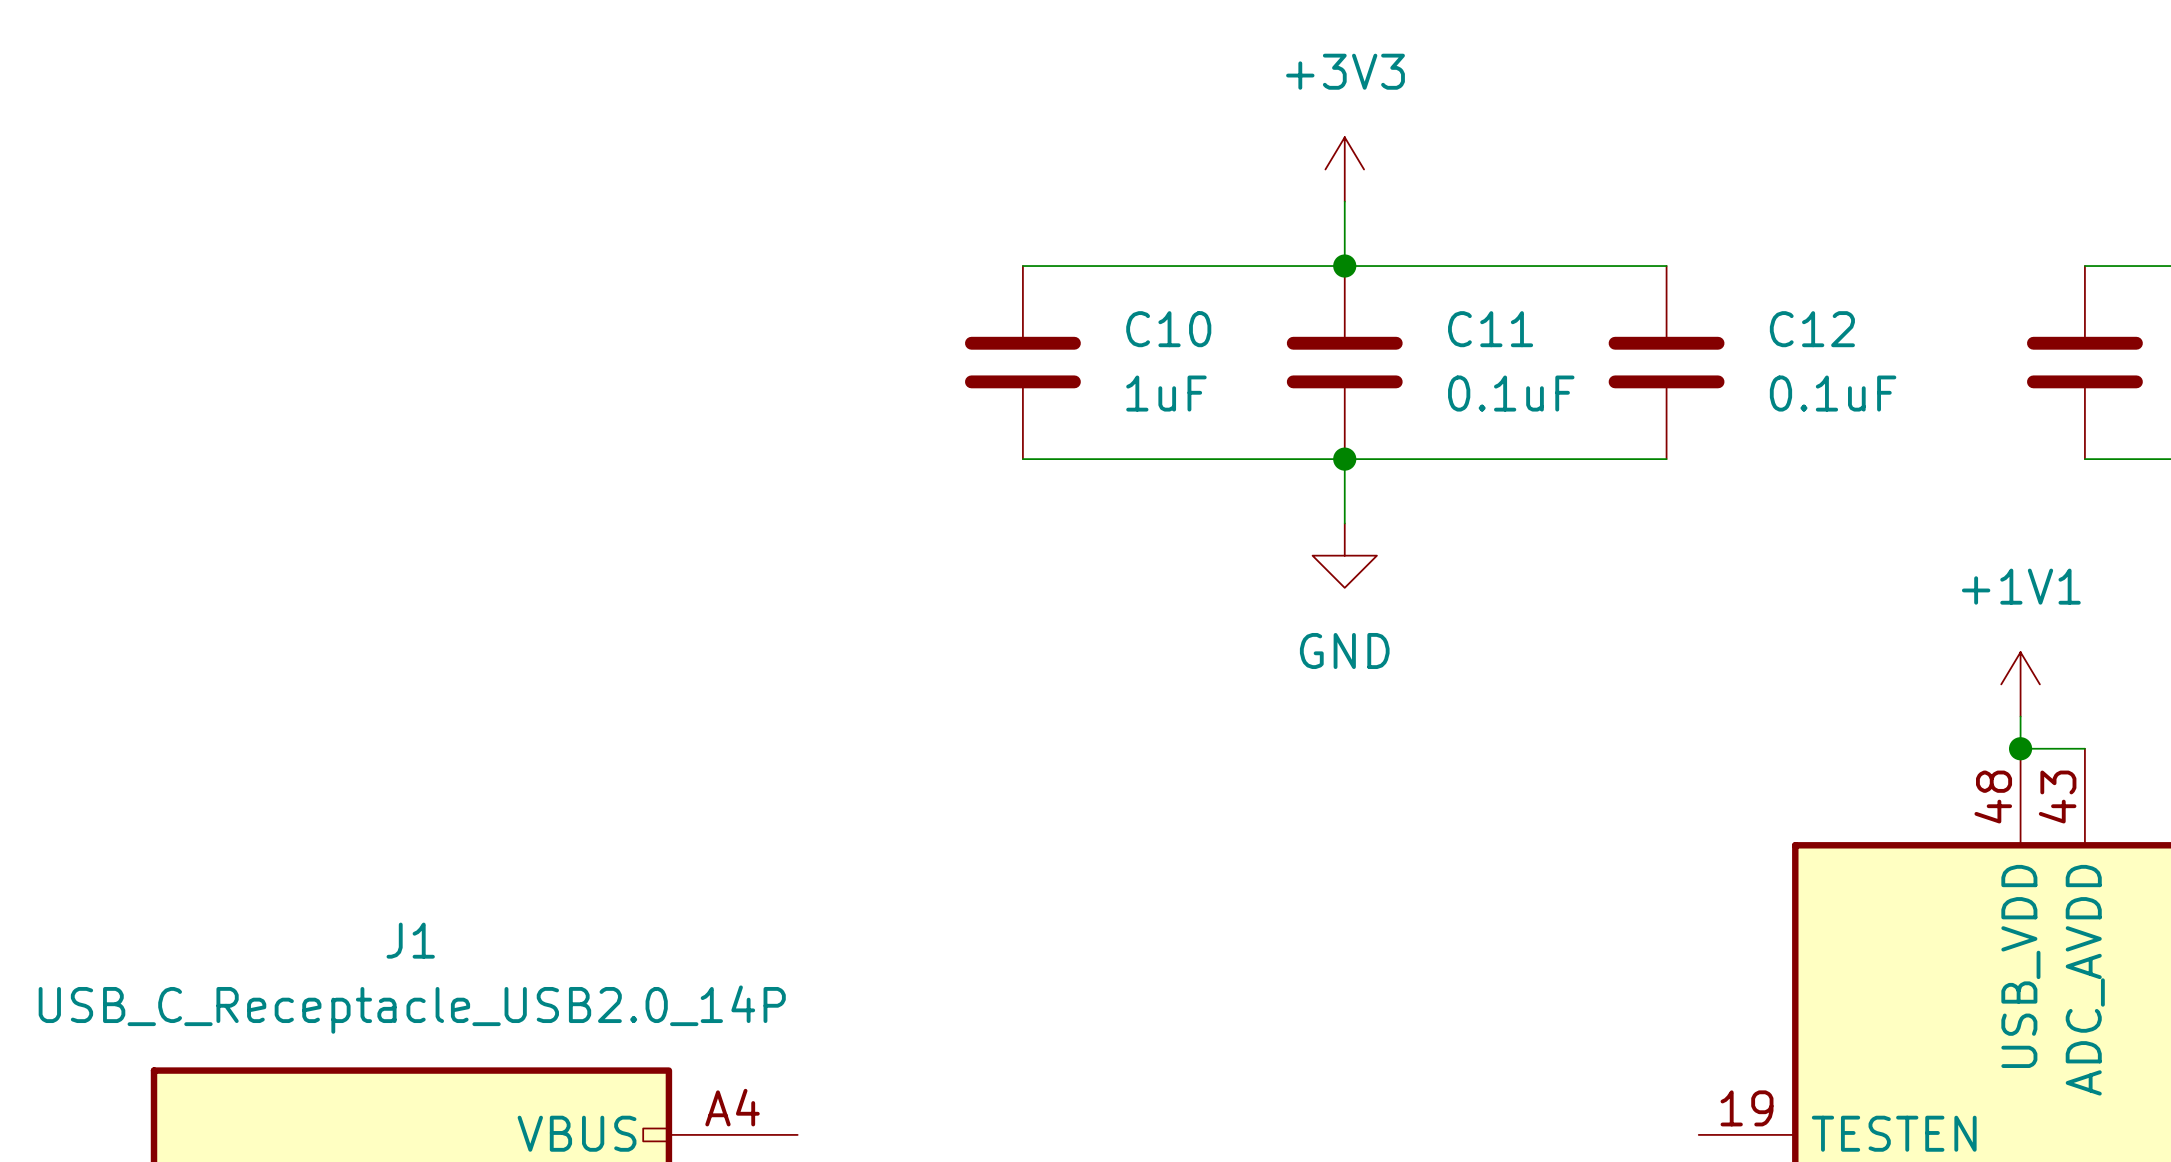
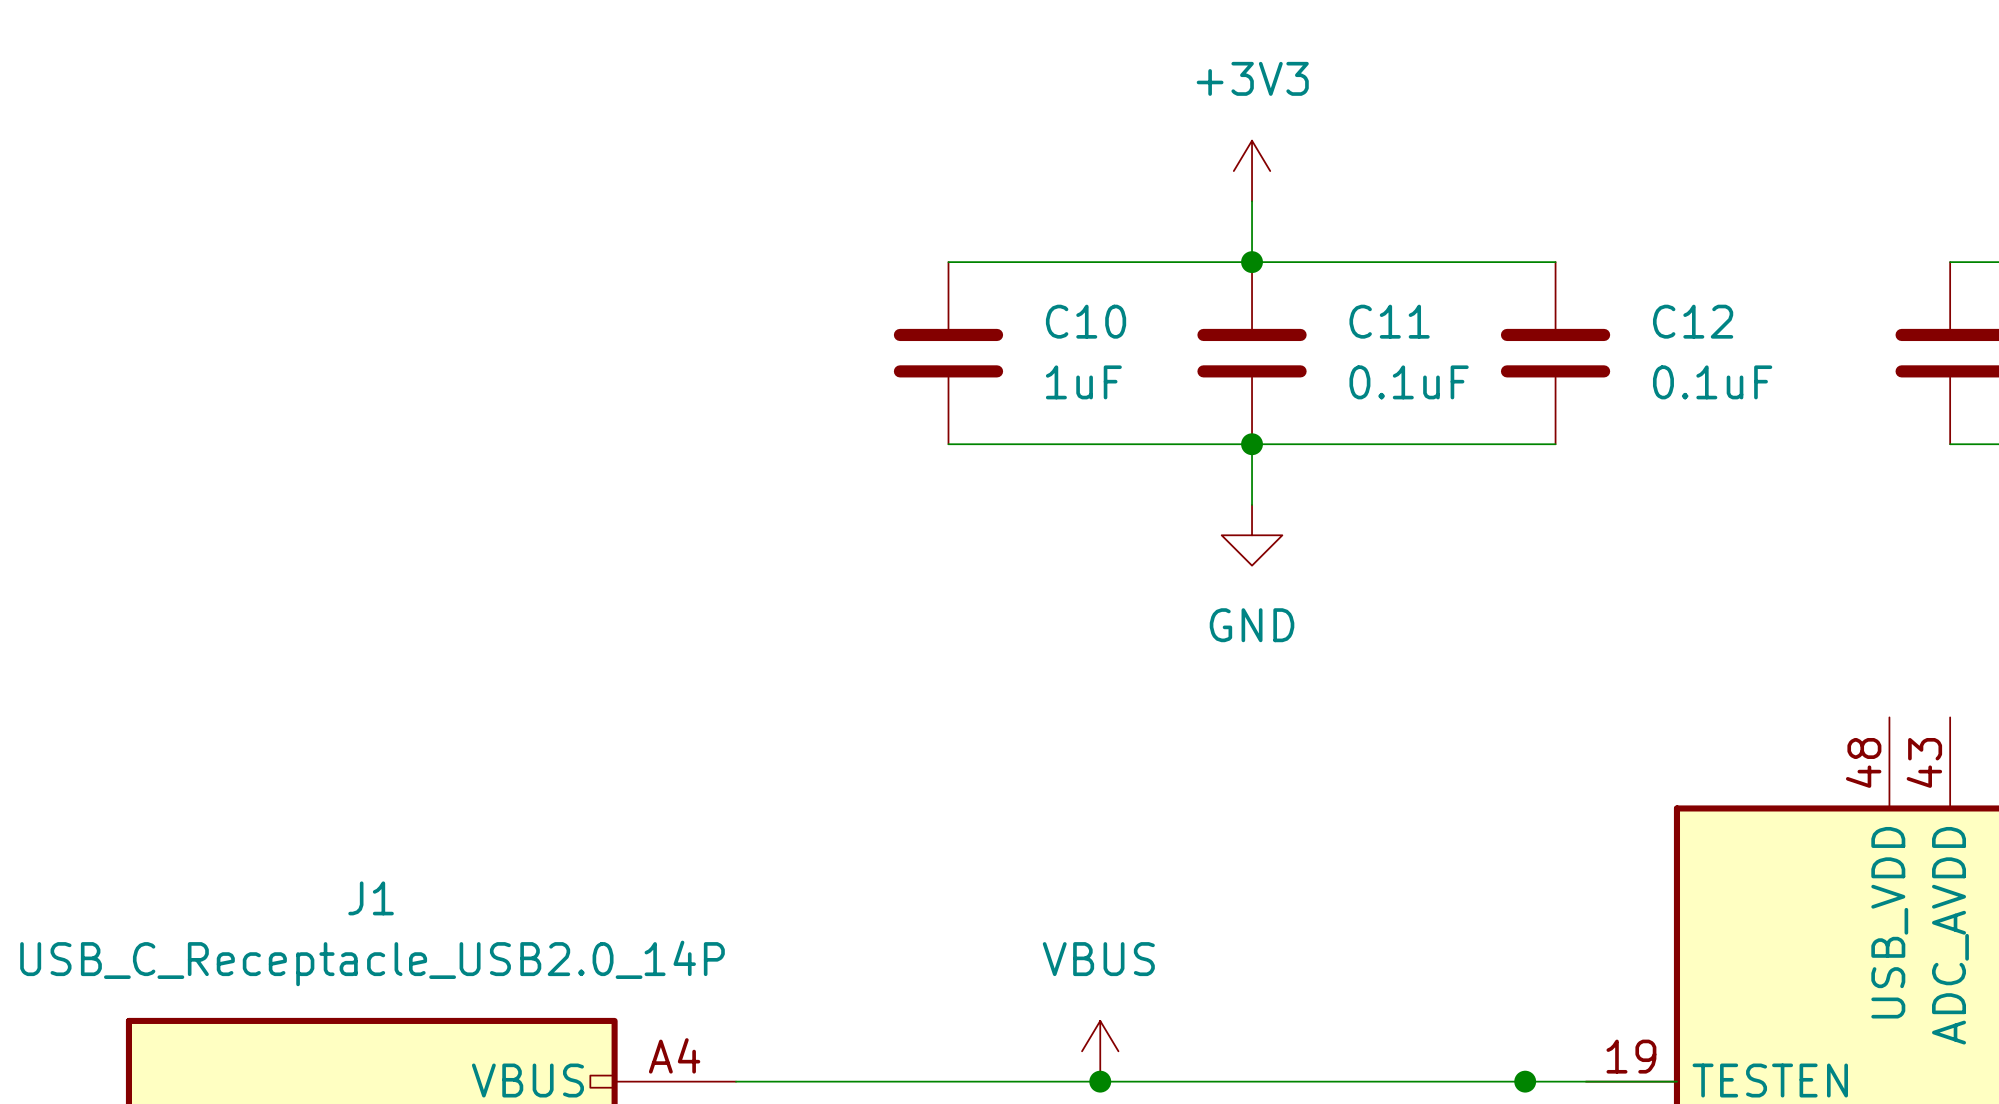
power symbol: +1V1 (2020, 684) -> none
wire: (2020, 716) (2020, 748) (2084, 748) -> none
junction: (2020, 748) -> none
power symbol: none -> VBUS (1100, 1051)
wire: none -> (736, 1081) (1676, 1081)
junction: none -> (1100, 1081)
junction: none -> (1525, 1081)

